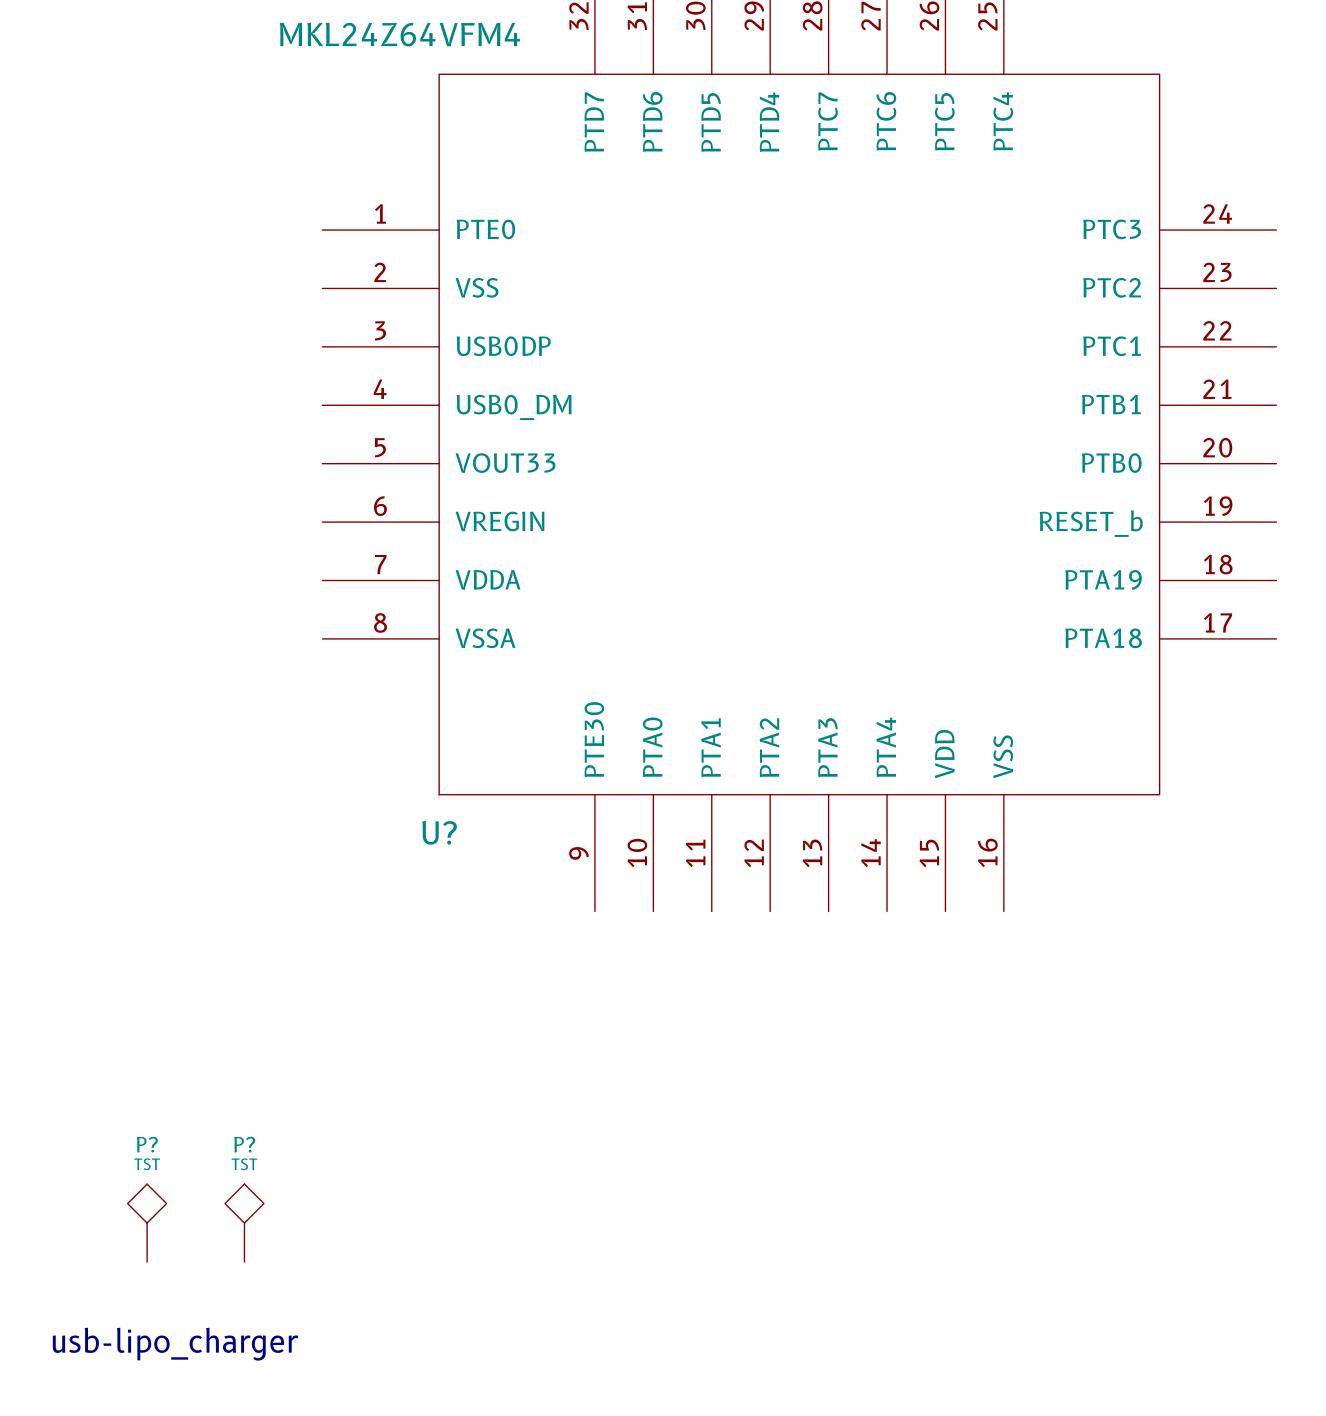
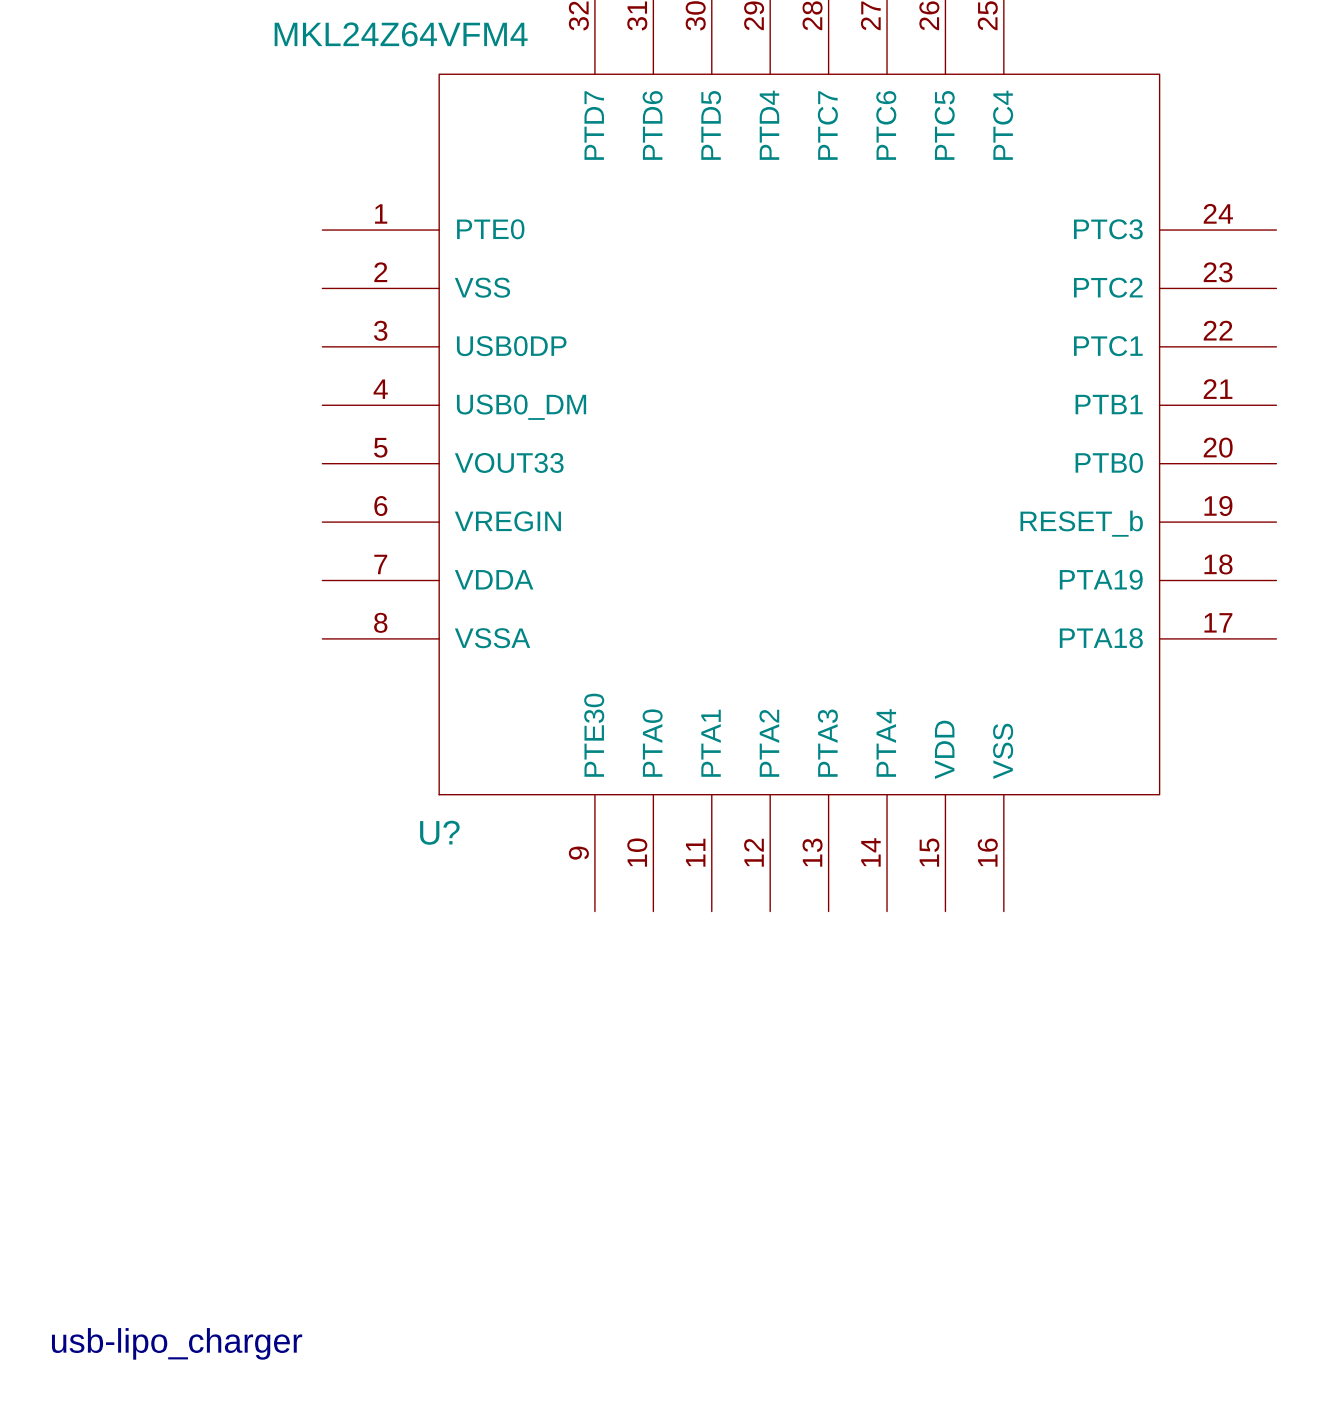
P?: TST (147, 1223) -> none
P?: TST (244, 1223) -> none

